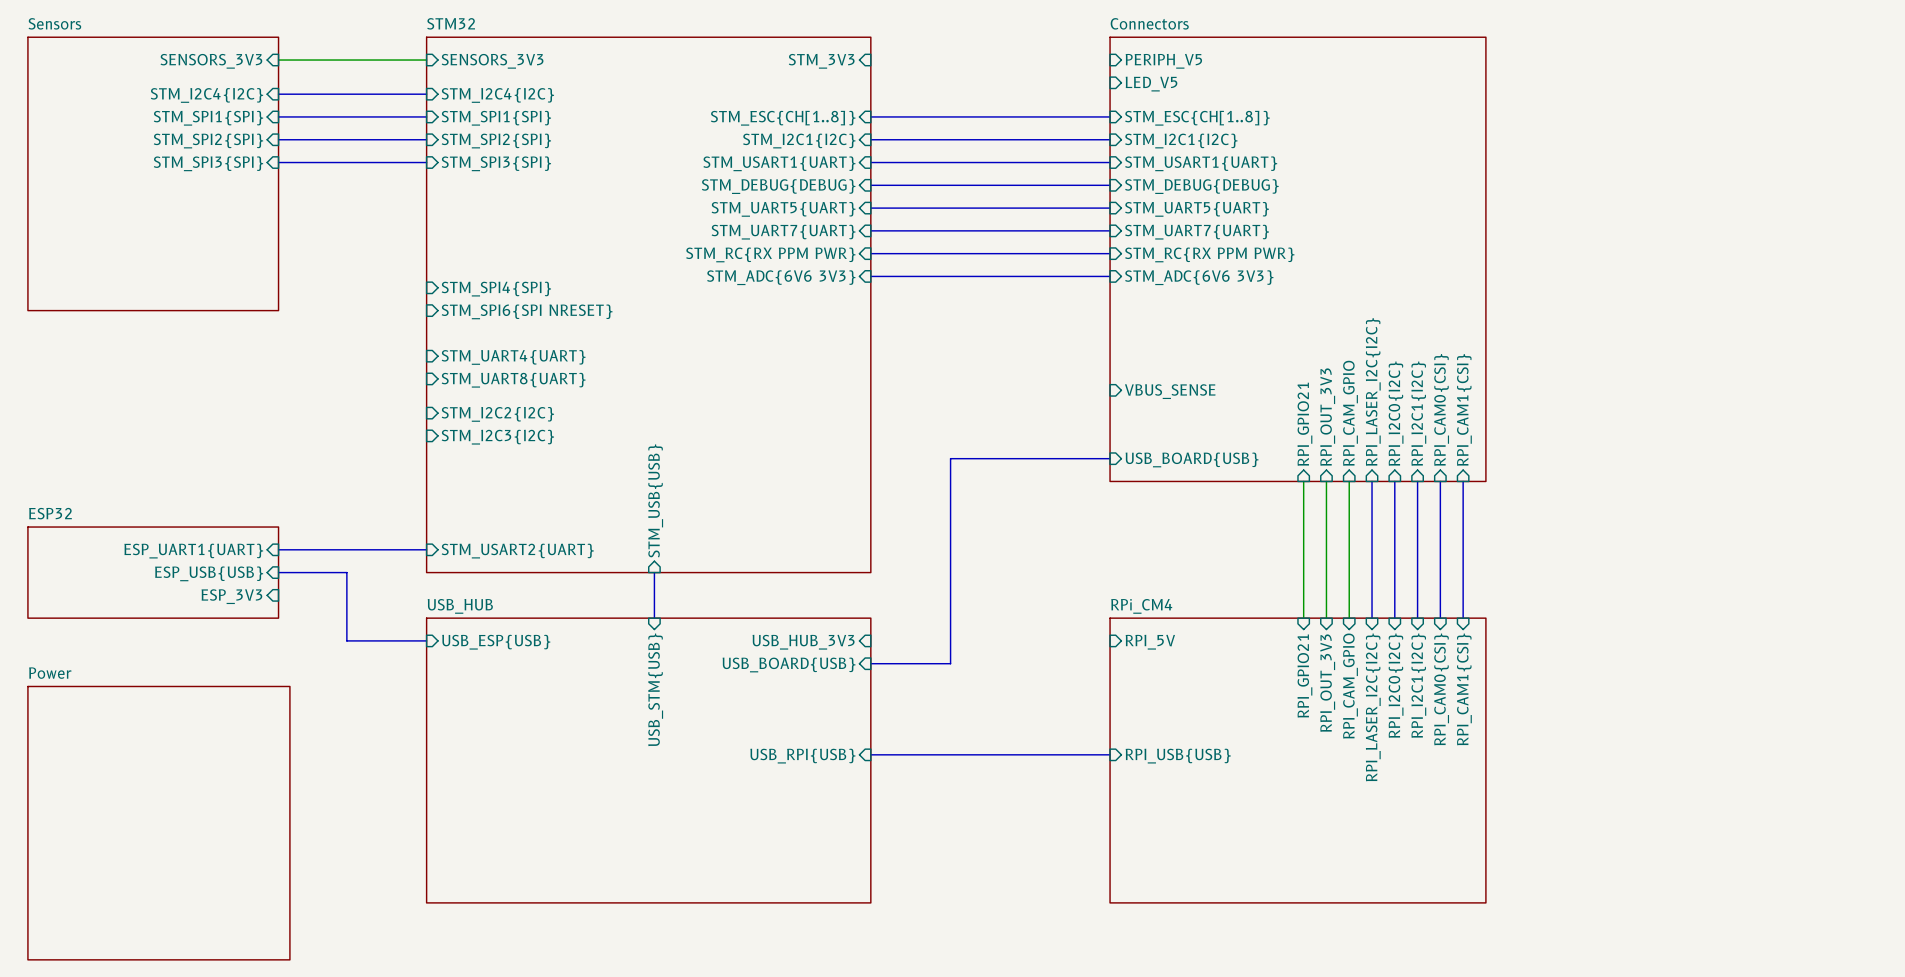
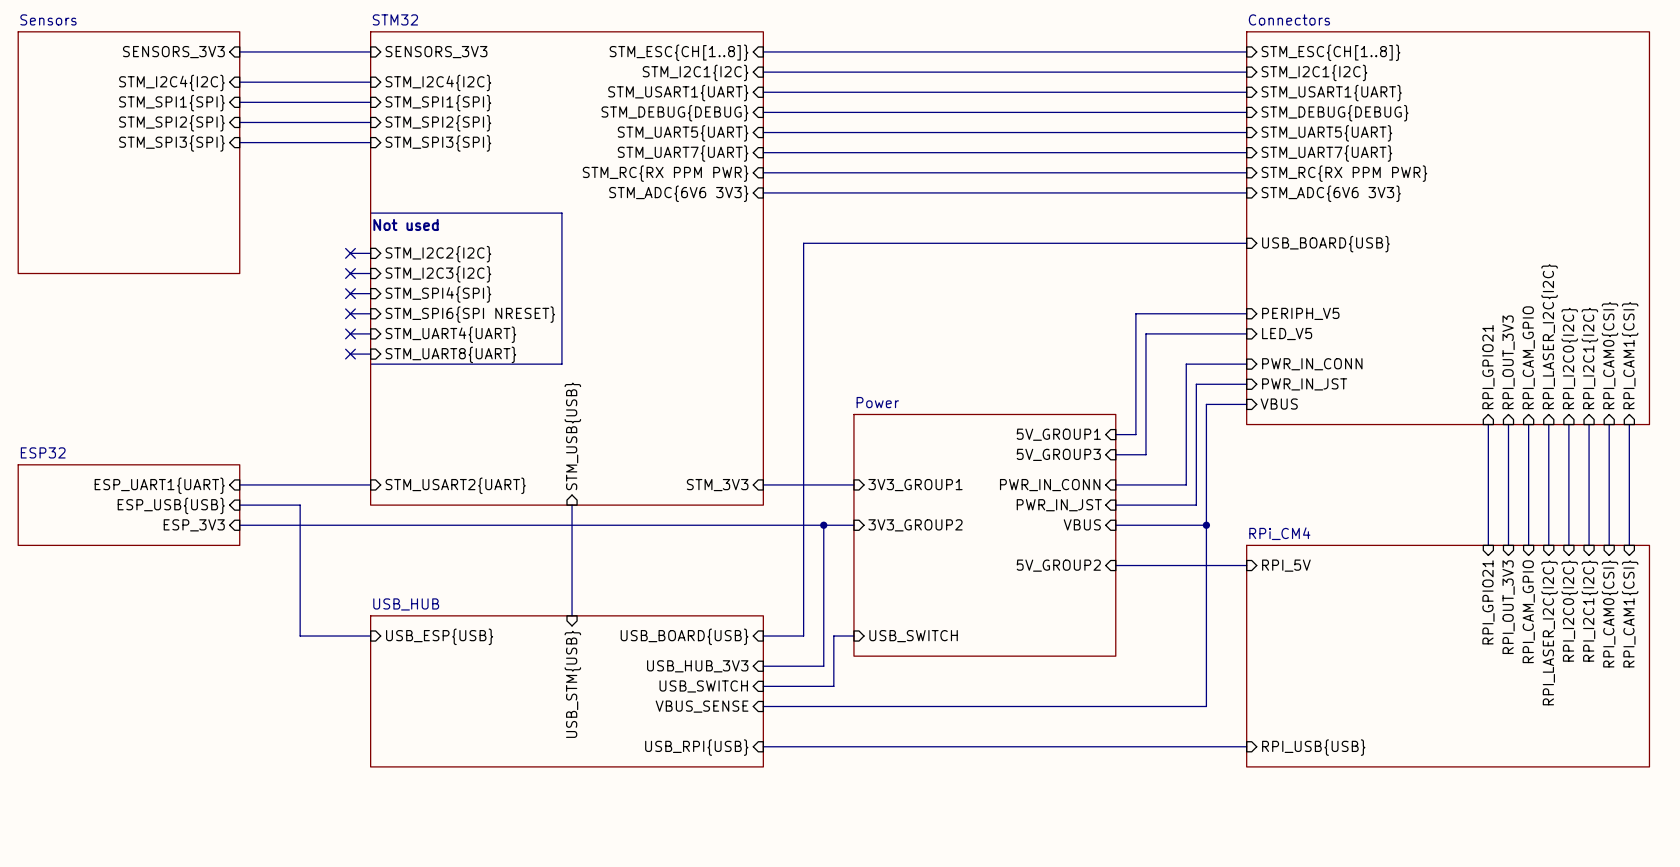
bus: none -> (763, 51) (1246, 51)
sheet pin: STM_3V3 (821, 61) -> STM_ESC{CH[1..8]} (679, 52)
sheet pin: PERIPH_V5 (1163, 61) -> none
sheet pin: none -> STM_ESC{CH[1..8]} (1330, 52)
bus: none -> (763, 72) (1246, 72)
sheet pin: LED_V5 (1151, 84) -> none
sheet pin: none -> STM_I2C1{I2C} (1314, 72)
bus: none -> (763, 92) (1246, 92)
sheet pin: none -> STM_USART1{UART} (1331, 93)
bus: (870, 116) (1110, 116) -> none
sheet pin: STM_ESC{CH[1..8]} (783, 118) -> none
sheet pin: STM_ESC{CH[1..8]} (1197, 118) -> none
bus: none -> (763, 112) (1246, 112)
sheet pin: none -> STM_DEBUG{DEBUG} (1335, 113)
bus: (870, 139) (1110, 139) -> none
sheet pin position: STM_I2C1{I2C} (799, 141) -> STM_I2C1{I2C} (695, 72)
sheet pin: STM_I2C1{I2C} (1181, 141) -> none
bus: none -> (763, 132) (1246, 132)
sheet pin: none -> STM_UART5{UART} (1326, 133)
bus: (870, 162) (1110, 162) -> none
sheet pin position: STM_USART1{UART} (779, 163) -> STM_USART1{UART} (678, 93)
sheet pin: STM_USART1{UART} (1201, 163) -> none
bus: none -> (763, 152) (1246, 152)
sheet pin: none -> STM_UART7{UART} (1326, 153)
bus: (870, 185) (1110, 185) -> none
sheet pin position: STM_DEBUG{DEBUG} (778, 186) -> STM_DEBUG{DEBUG} (674, 113)
sheet pin: STM_DEBUG{DEBUG} (1201, 186) -> none
bus: none -> (763, 172) (1246, 172)
sheet pin: none -> STM_RC{RX PPM PWR} (1344, 173)
bus: (870, 208) (1110, 208) -> none
sheet pin position: STM_UART5{UART} (783, 209) -> STM_UART5{UART} (683, 133)
sheet pin: STM_UART5{UART} (1197, 209) -> none
bus: none -> (763, 192) (1246, 192)
sheet pin: none -> STM_ADC{6V6 3V3} (1331, 193)
bus: (870, 230) (1110, 230) -> none
sheet pin position: STM_UART7{UART} (783, 232) -> STM_UART7{UART} (683, 153)
sheet pin: STM_UART7{UART} (1197, 232) -> none
line: none -> (370, 213) (561, 213) (561, 364) (370, 364)
bus: (870, 253) (1110, 253) -> none
sheet pin position: STM_RC{RX PPM PWR} (770, 254) -> STM_RC{RX PPM PWR} (665, 173)
sheet pin: STM_RC{RX PPM PWR} (1209, 254) -> none
text: none -> Not used (406, 224)
sheet Connectors: (1297, 259) -> none
sheet Connectors: none -> (1448, 228)
bus: (870, 276) (916, 276) -> (763, 636) (803, 636) (803, 243)
bus: none -> (974, 243) (1246, 243)
sheet pin position: STM_ADC{6V6 3V3} (781, 277) -> STM_ADC{6V6 3V3} (678, 193)
sheet pin: STM_ADC{6V6 3V3} (1199, 277) -> none
sheet pin: none -> USB_BOARD{USB} (1325, 244)
bus: none -> (350, 253) (370, 253)
no-connect mark: none -> (350, 253)
sheet pin: STM_SPI4{SPI} (496, 289) -> STM_I2C2{I2C} (438, 254)
bus: none -> (350, 273) (370, 273)
no-connect mark: none -> (350, 273)
sheet pin: STM_SPI6{SPI NRESET} (527, 311) -> STM_I2C3{I2C} (438, 274)
bus: none -> (350, 293) (370, 293)
no-connect mark: none -> (350, 293)
sheet pin: none -> STM_SPI4{SPI} (438, 294)
bus: none -> (350, 313) (370, 313)
no-connect mark: none -> (350, 313)
wire: none -> (1246, 313) (1135, 313) (1135, 434) (1115, 434)
sheet pin: STM_UART4{UART} (513, 357) -> STM_SPI6{SPI NRESET} (470, 314)
sheet pin: none -> PERIPH_V5 (1300, 313)
bus: none -> (350, 333) (370, 333)
no-connect mark: none -> (350, 333)
wire: none -> (1246, 333) (1145, 333) (1145, 424)
sheet pin: STM_UART8{UART} (513, 380) -> STM_UART4{UART} (450, 334)
sheet pin: none -> LED_V5 (1287, 334)
sheet pin: VBUS_SENSE (1170, 391) -> none
sheet pin: RPI_LASER_I2C{I2C} (1373, 391) -> none
sheet pin: none -> RPI_LASER_I2C{I2C} (1549, 336)
bus: none -> (350, 354) (370, 354)
no-connect mark: none -> (350, 354)
sheet pin: none -> STM_UART8{UART} (450, 354)
sheet pin: RPI_CAM0{CSI} (1441, 409) -> none
sheet pin: RPI_CAM1{CSI} (1464, 409) -> none
sheet pin: none -> RPI_CAM0{CSI} (1610, 355)
sheet pin: none -> RPI_CAM1{CSI} (1630, 355)
sheet pin: RPI_CAM_GPIO (1350, 413) -> none
sheet pin: RPI_I2C0{I2C} (1396, 413) -> none
wire: none -> (1246, 364) (1186, 364) (1186, 424)
sheet pin: RPI_I2C1{I2C} (1418, 413) -> none
sheet pin: none -> RPI_CAM_GPIO (1528, 357)
sheet pin: none -> RPI_I2C0{I2C} (1569, 358)
sheet pin: none -> RPI_I2C1{I2C} (1589, 358)
sheet pin: STM_I2C2{I2C} (497, 414) -> none
sheet pin: none -> PWR_IN_CONN (1312, 364)
sheet pin: RPI_OUT_3V3 (1327, 417) -> none
sheet pin: none -> RPI_OUT_3V3 (1508, 362)
sheet pin: RPI_GPIO21 (1304, 424) -> none
sheet pin: none -> RPI_GPIO21 (1488, 367)
wire: none -> (1246, 384) (1196, 384) (1196, 505) (1115, 505)
sheet pin: STM_I2C3{I2C} (497, 437) -> none
sheet pin: none -> PWR_IN_JST (1304, 384)
bus: (1110, 458) (950, 458) (950, 663) (870, 663) -> none
wire: none -> (1246, 404) (1206, 404) (1206, 706) (763, 706)
sheet pin: none -> VBUS (1279, 404)
sheet pin: USB_BOARD{USB} (1192, 459) -> none
wire: (1326, 481) (1326, 618) -> none
bus: (1372, 481) (1372, 618) -> none
bus: (1394, 481) (1394, 618) -> none
bus: (1417, 481) (1417, 618) -> none
bus: (1440, 481) (1440, 618) -> none
bus: (1463, 481) (1463, 618) -> none
wire: none -> (1488, 424) (1488, 545)
wire: none -> (1508, 424) (1508, 545)
wire: none -> (1528, 424) (1528, 545)
bus: none -> (1548, 424) (1548, 545)
bus: none -> (1568, 424) (1568, 545)
bus: none -> (1589, 424) (1589, 545)
bus: none -> (1609, 424) (1609, 545)
bus: none -> (1629, 424) (1629, 545)
sheet pin: none -> 5V_GROUP1 (1058, 434)
wire: (1303, 515) (1303, 618) -> (1145, 454) (1115, 454)
sheet pin: none -> 5V_GROUP3 (1058, 454)
wire: none -> (763, 484) (853, 484)
wire: (1349, 549) (1349, 618) -> (1186, 484) (1115, 484)
sheet pin: none -> STM_3V3 (717, 485)
sheet pin: none -> 3V3_GROUP1 (915, 485)
sheet pin: none -> PWR_IN_CONN (1050, 485)
sheet pin: none -> PWR_IN_JST (1059, 505)
wire: none -> (239, 525) (853, 525)
wire: none -> (823, 525) (823, 666) (763, 666)
junction: none -> (823, 525)
sheet pin: none -> VBUS (1082, 524)
wire: none -> (1115, 525) (1206, 525)
junction: none -> (1206, 525)
sheet pin: none -> 3V3_GROUP2 (915, 525)
sheet Power: none -> (984, 535)
sheet RPi_CM4 name position: RPi_CM4 (1141, 606) -> RPi_CM4 (1279, 533)
bus: none -> (572, 545) (572, 615)
sheet RPi_CM4 shape: [1110, 618, 1486, 903] -> [1246, 545, 1650, 767]
bus: (346, 640) (426, 640) -> (300, 565) (300, 636) (370, 636)
wire: none -> (1115, 565) (1246, 565)
sheet pin position: USB_ESP{USB} (496, 642) -> USB_ESP{USB} (439, 636)
sheet pin: USB_HUB_3V3 (803, 642) -> none
sheet pin: RPI_5V (1150, 642) -> none
sheet pin: none -> 5V_GROUP2 (1058, 565)
sheet pin: none -> RPI_5V (1286, 565)
sheet pin position: USB_BOARD{USB} (789, 664) -> USB_BOARD{USB} (684, 636)
sheet pin: RPI_GPIO21 (1304, 676) -> none
sheet pin: none -> RPI_GPIO21 (1488, 602)
sheet pin: RPI_OUT_3V3 (1327, 683) -> none
sheet pin: none -> RPI_OUT_3V3 (1508, 607)
sheet pin: RPI_I2C0{I2C} (1396, 685) -> none
sheet pin: RPI_I2C1{I2C} (1418, 685) -> none
sheet pin: none -> RPI_I2C0{I2C} (1569, 610)
sheet pin: none -> RPI_I2C1{I2C} (1589, 610)
sheet pin: RPI_CAM_GPIO (1350, 686) -> none
sheet pin: none -> RPI_CAM_GPIO (1528, 611)
sheet pin position: USB_STM{USB} (655, 689) -> USB_STM{USB} (572, 684)
sheet pin: RPI_CAM0{CSI} (1441, 689) -> none
sheet pin: RPI_CAM1{CSI} (1464, 689) -> none
sheet pin: none -> RPI_CAM0{CSI} (1610, 613)
sheet pin: none -> RPI_CAM1{CSI} (1630, 613)
sheet pin: RPI_LASER_I2C{I2C} (1373, 707) -> none
sheet pin: none -> RPI_LASER_I2C{I2C} (1549, 632)
wire: none -> (853, 636) (833, 636) (833, 686) (763, 686)
sheet pin: none -> USB_SWITCH (913, 636)
bus: (870, 754) (1110, 754) -> none
sheet pin: USB_RPI{USB} (802, 756) -> USB_HUB_3V3 (697, 666)
sheet pin: RPI_USB{USB} (1178, 756) -> none
sheet USB_HUB: (648, 760) -> none
sheet pin: none -> USB_SWITCH (703, 686)
sheet USB_HUB: none -> (566, 691)
sheet pin: none -> VBUS_SENSE (702, 706)
sheet Power: (158, 823) -> none
bus: none -> (763, 746) (1246, 746)
sheet pin: none -> USB_RPI{USB} (696, 747)
sheet pin: none -> RPI_USB{USB} (1313, 747)

